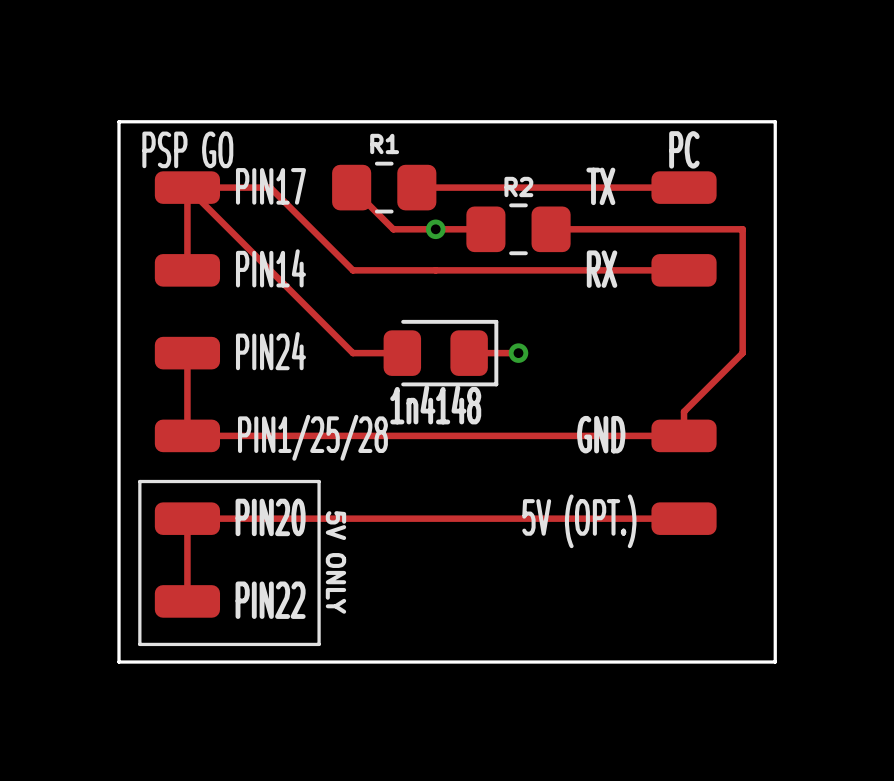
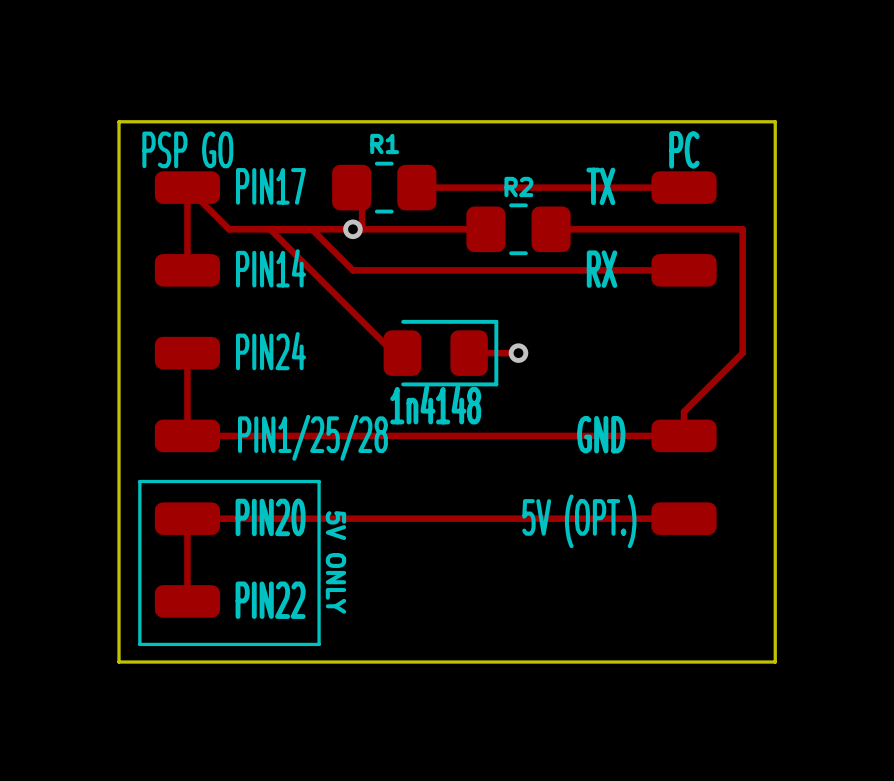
track: (187, 187) (270, 187) (311, 229) -> none
track: (362, 198) (393, 229) -> (362, 198) (362, 229)
track: (229, 229) (352, 353) (402, 353) -> (229, 229) (393, 229)
track: none -> (270, 229) (394, 353)
via position: (435, 229) -> (352, 229)

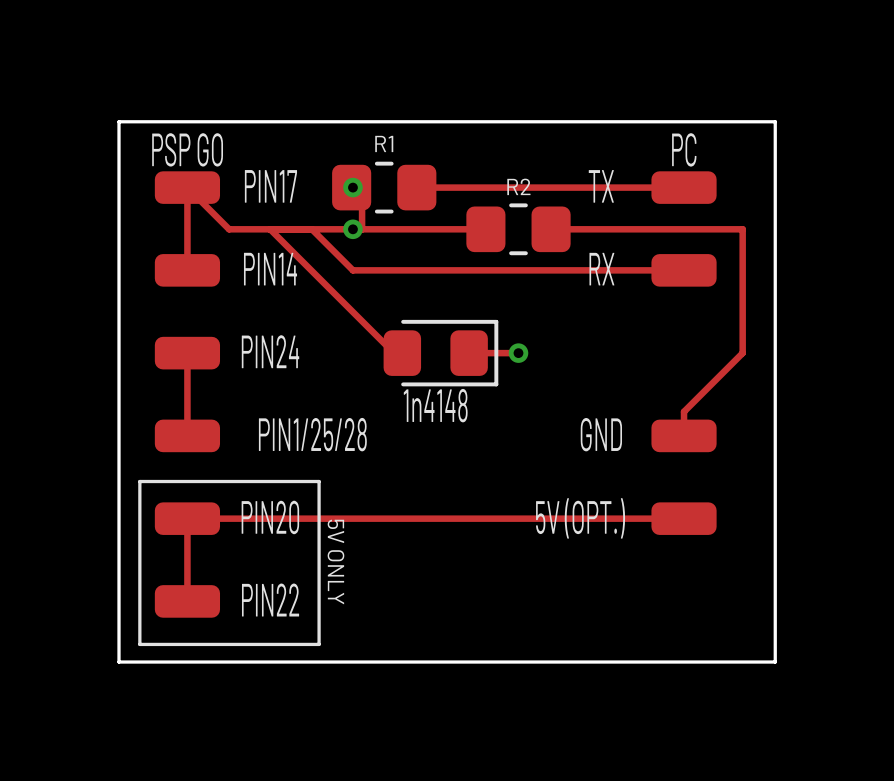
via: none -> (352, 187)
track: (187, 435) (684, 435) -> none

